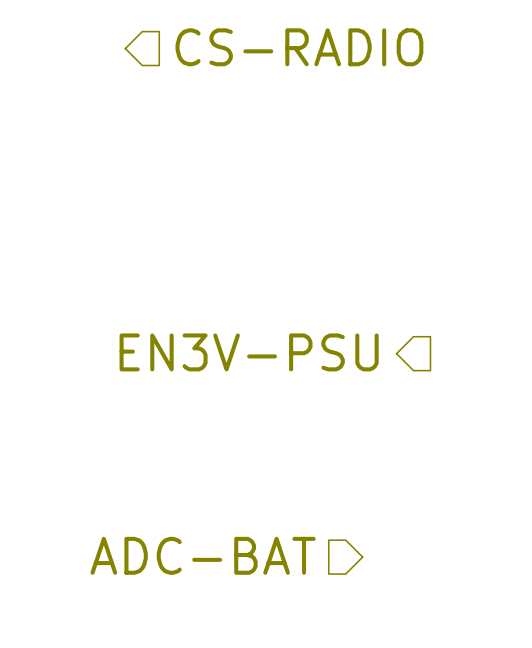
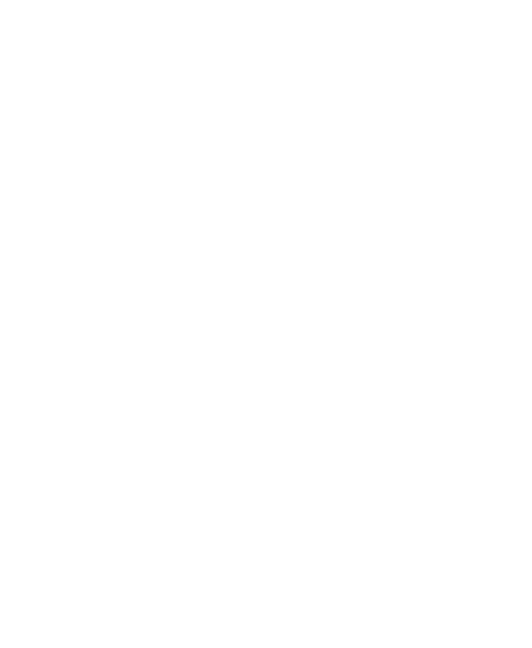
hierarchical label: CS-RADIO (299, 47) -> none
hierarchical label: EN3V-PSU (249, 352) -> none
hierarchical label: ADC-BAT (203, 555) -> none

